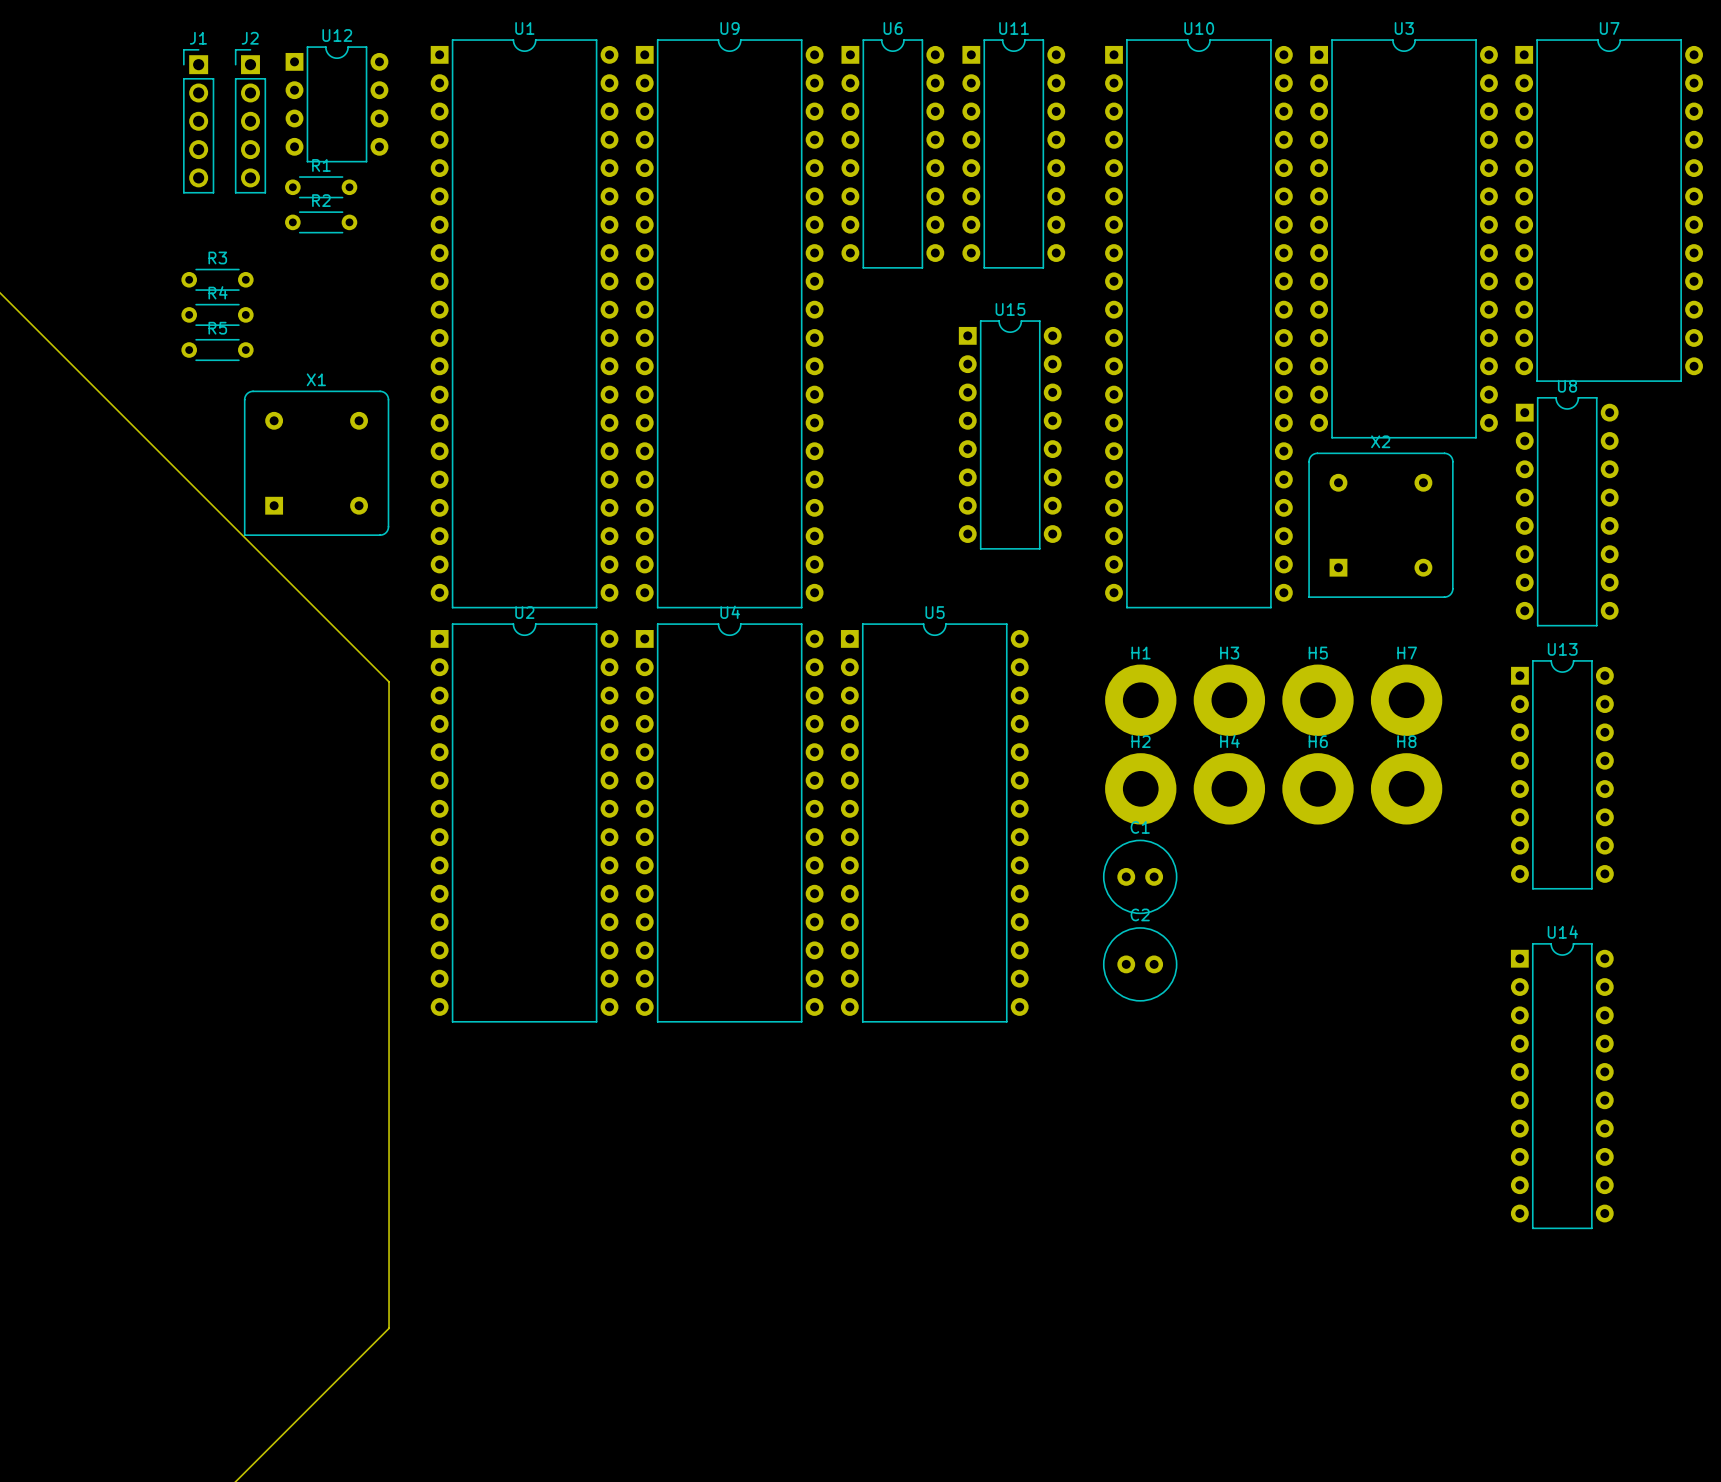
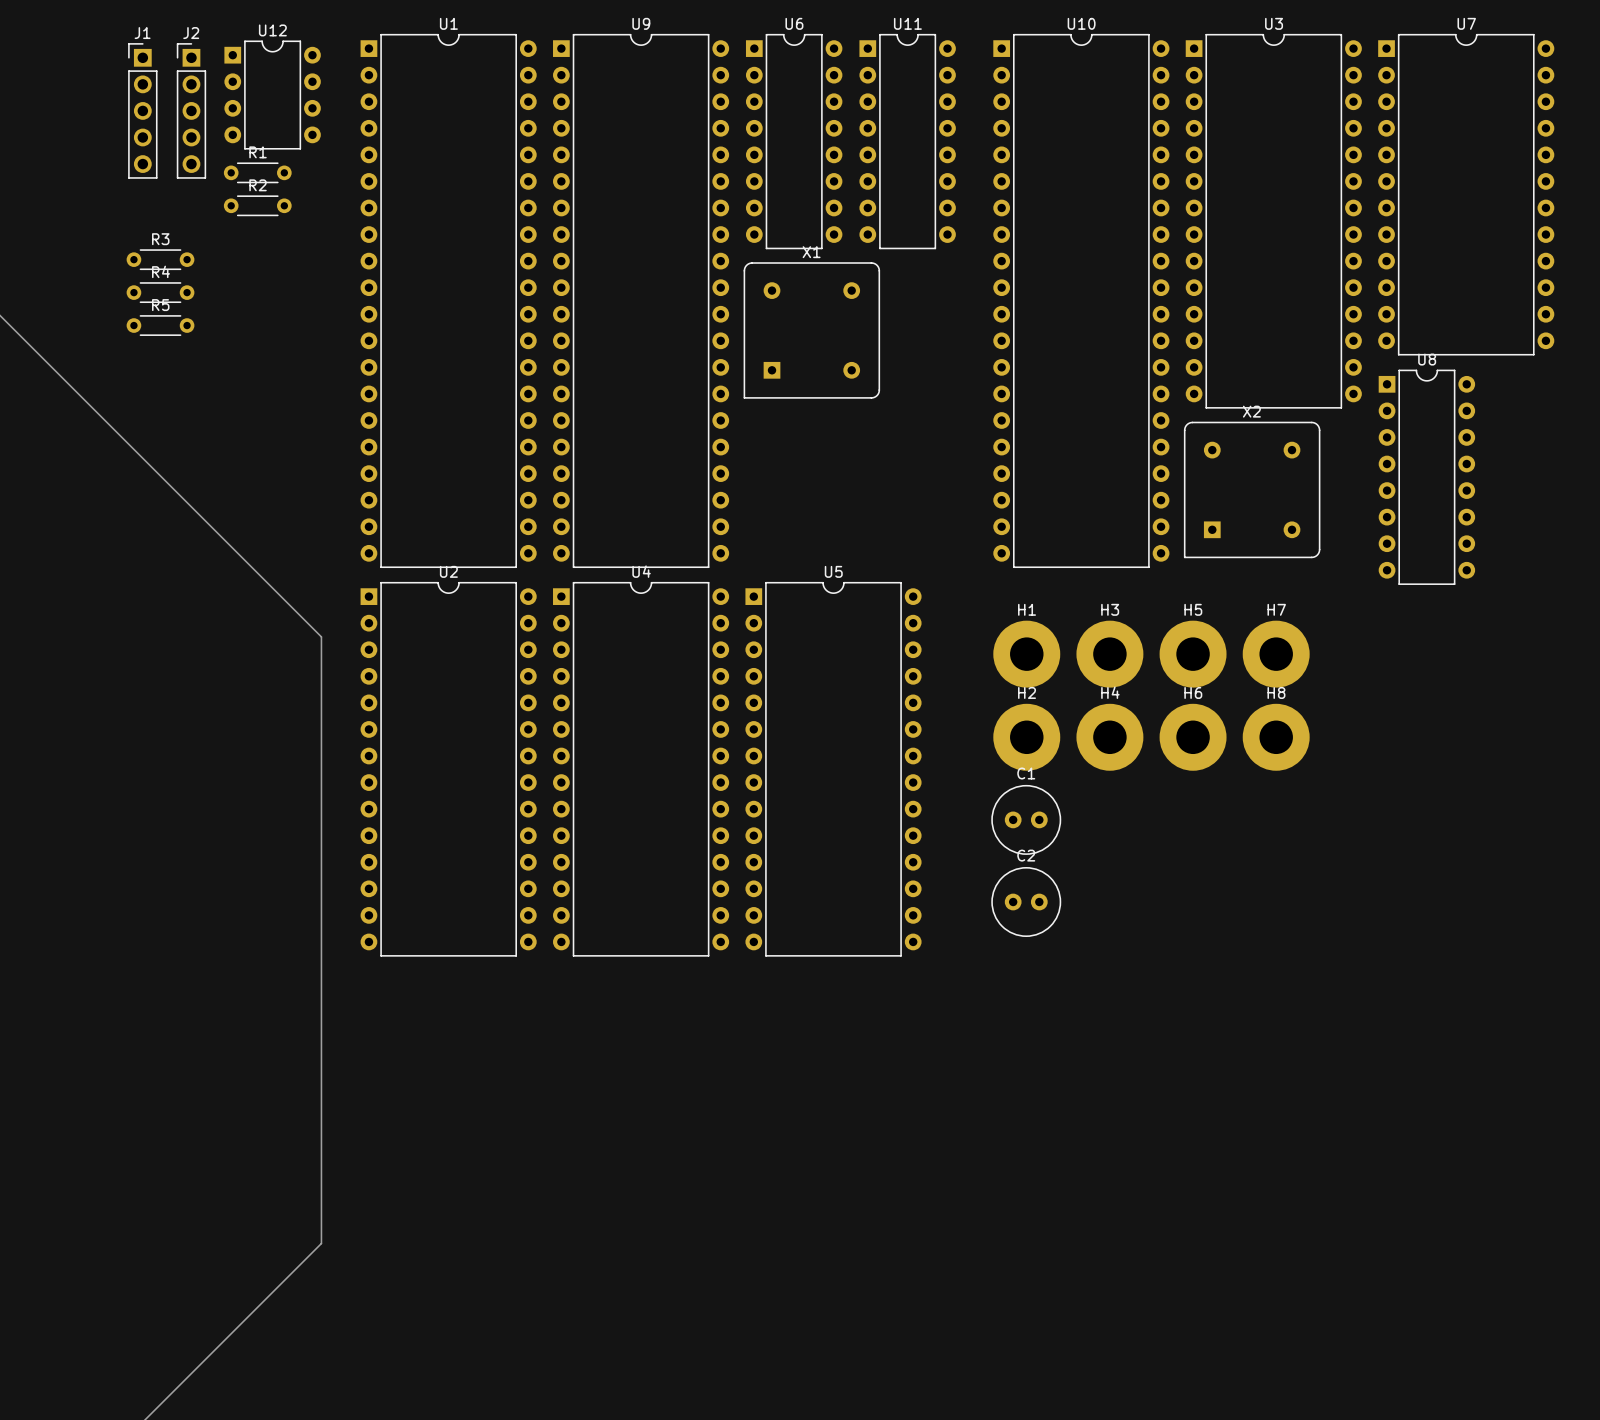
U15: (1010, 434) -> none
X1 position: (316, 463) -> (811, 330)
U13: (1562, 774) -> none
U14: (1562, 1086) -> none

